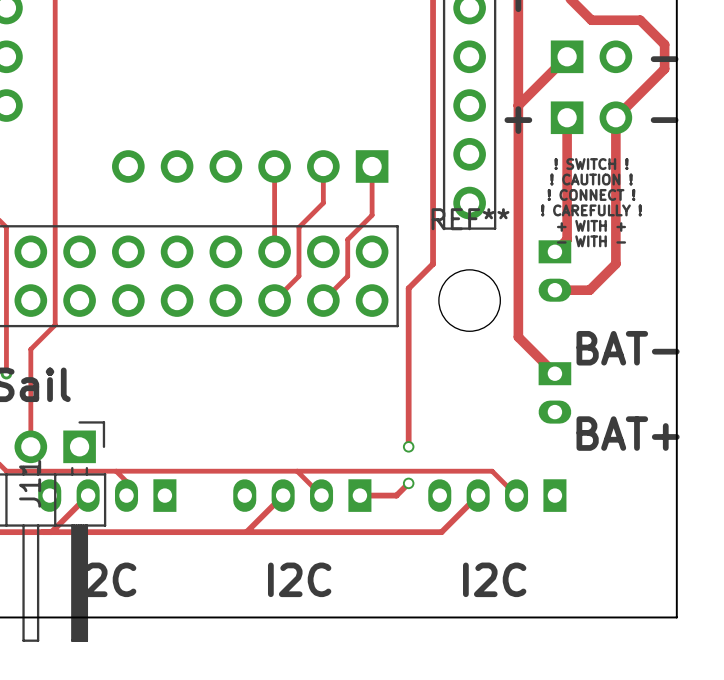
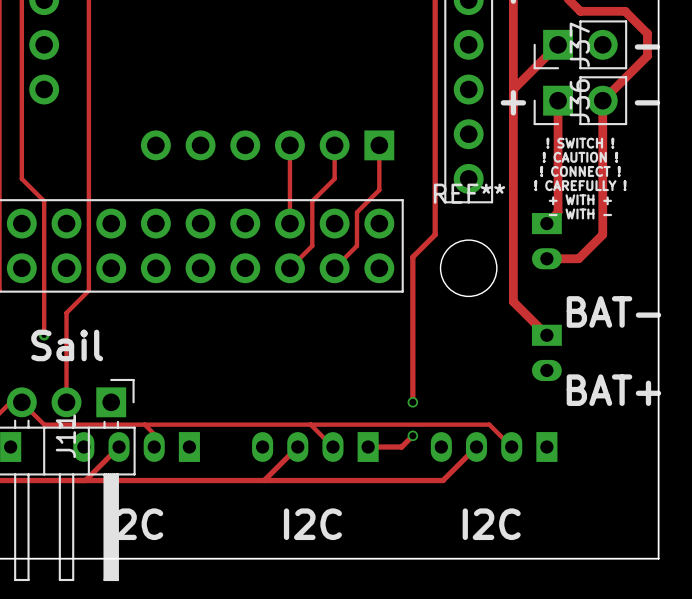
J37 side: bottom (591, 56) -> top (580, 44)
J36 side: bottom (591, 117) -> top (580, 100)

